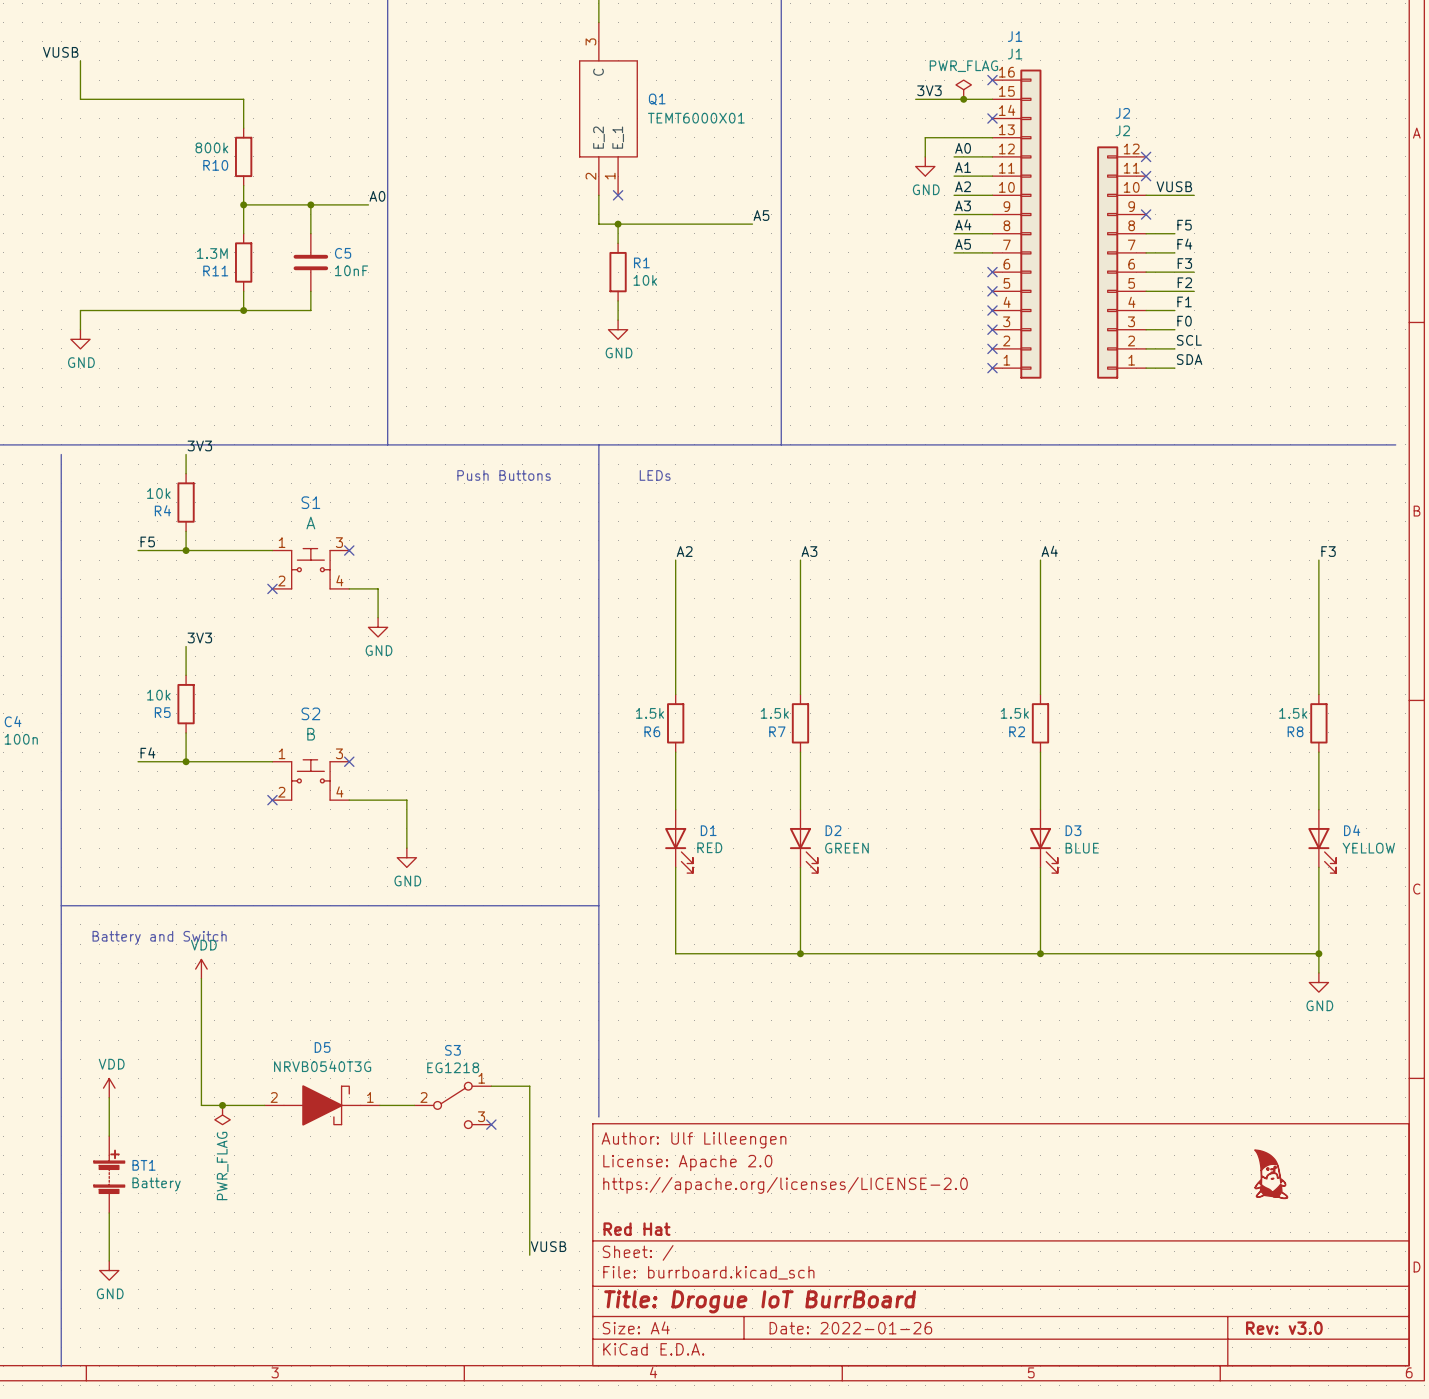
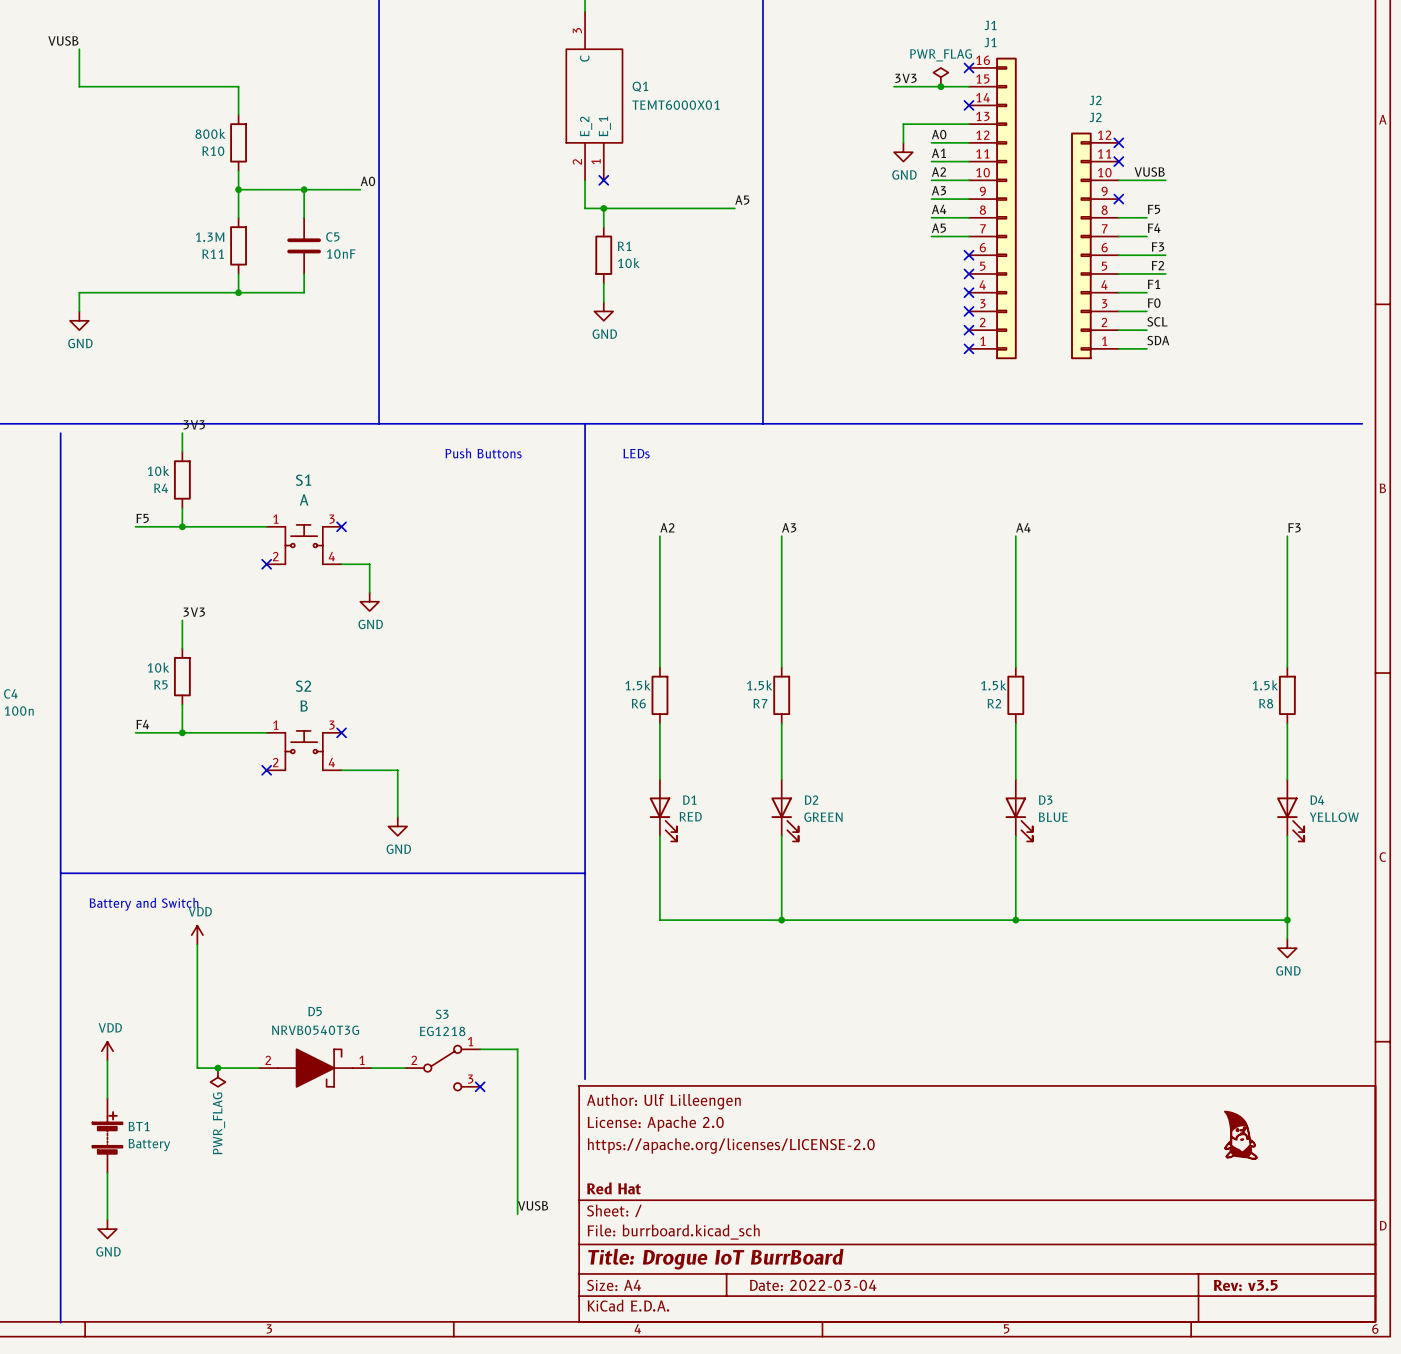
title block: Date: 2022-01-26 (850, 1328) -> Date: 2022-03-04 (813, 1285)
title block: Rev: v3.0 (1284, 1328) -> Rev: v3.5 (1245, 1285)

